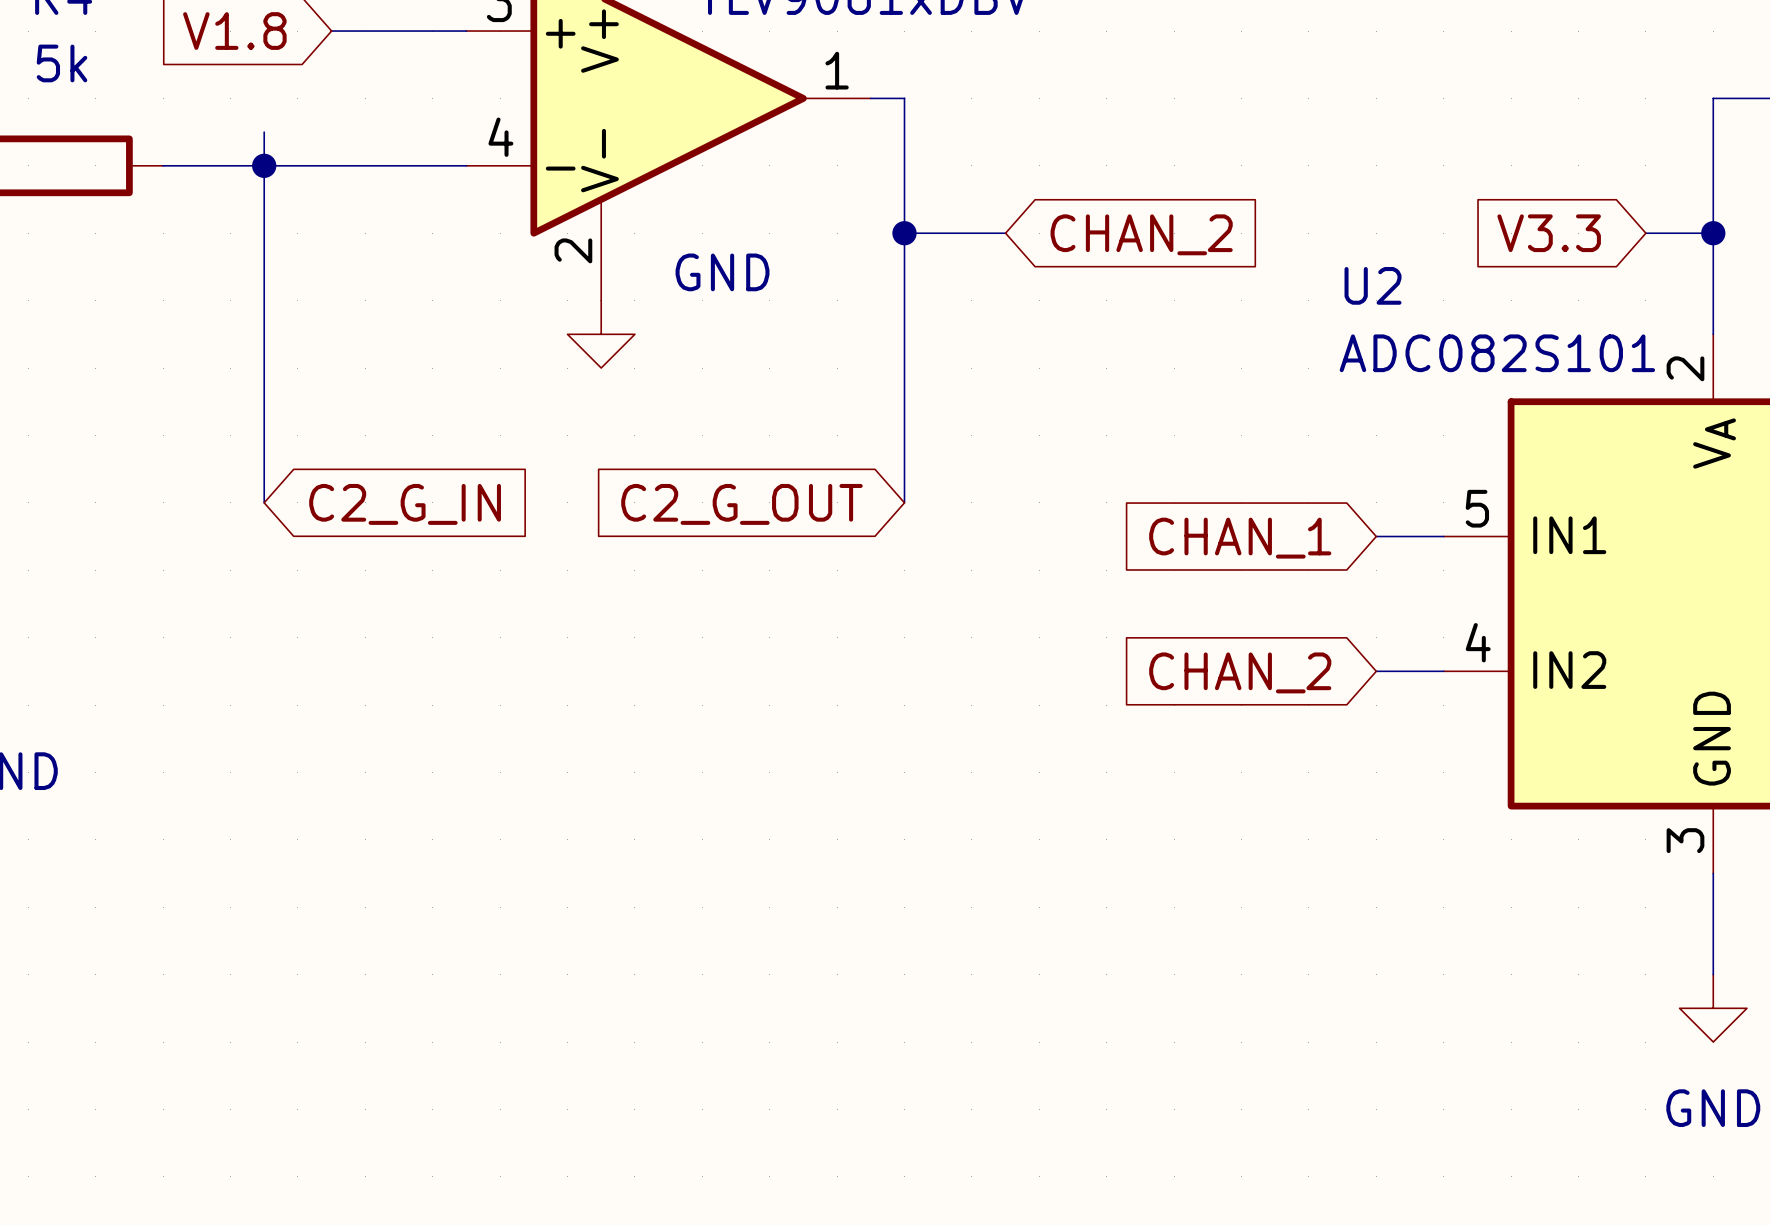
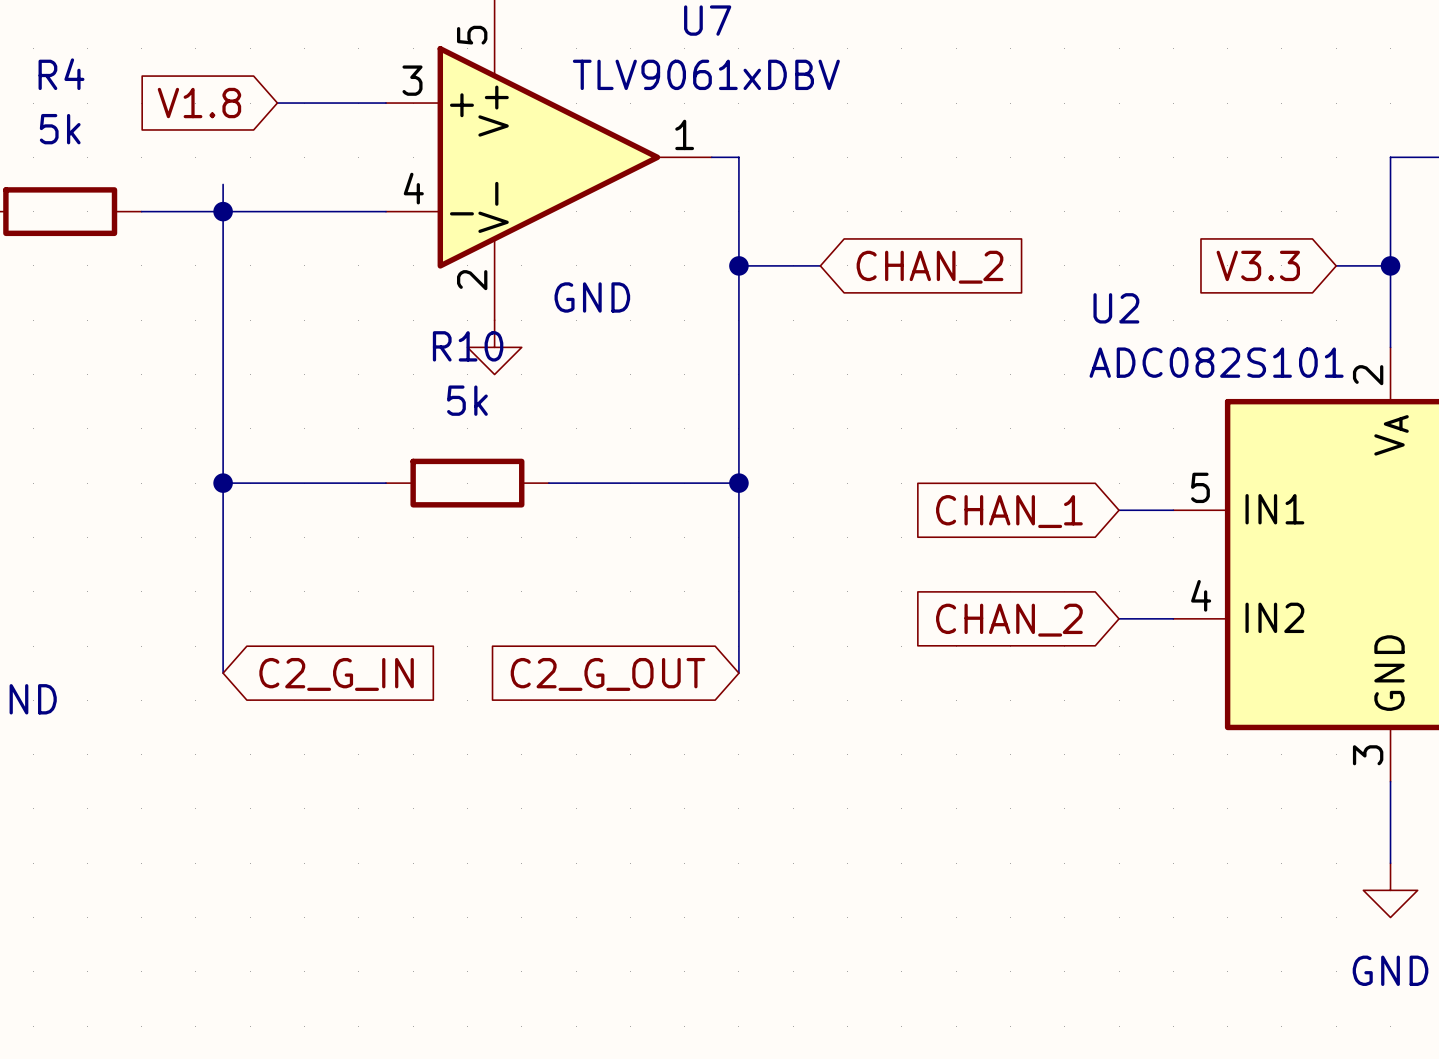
junction: none -> (223, 483)
wire: none -> (385, 483) (223, 483) (223, 673)
R10: none -> 5k (467, 483)
wire: none -> (548, 483) (738, 483) (738, 673)
junction: none -> (738, 483)
global label position: C2_G_IN (405, 504) -> C2_G_IN (336, 674)
global label position: C2_G_OUT (741, 504) -> C2_G_OUT (607, 674)

